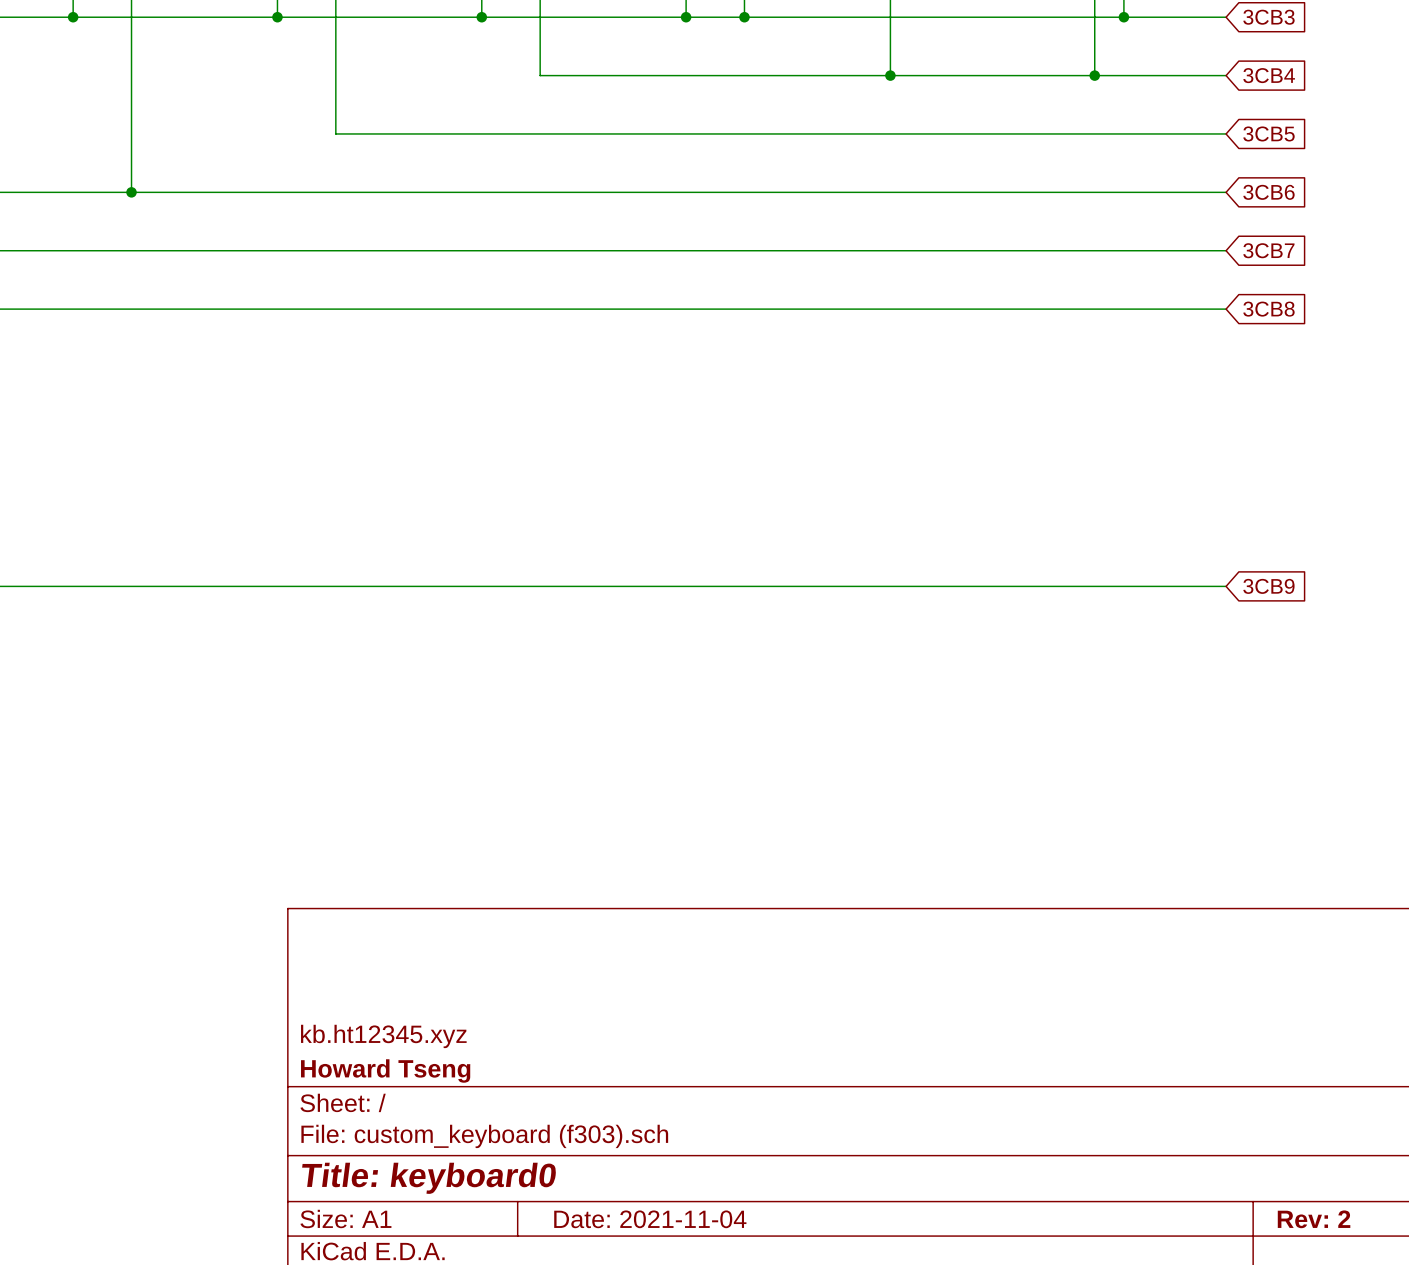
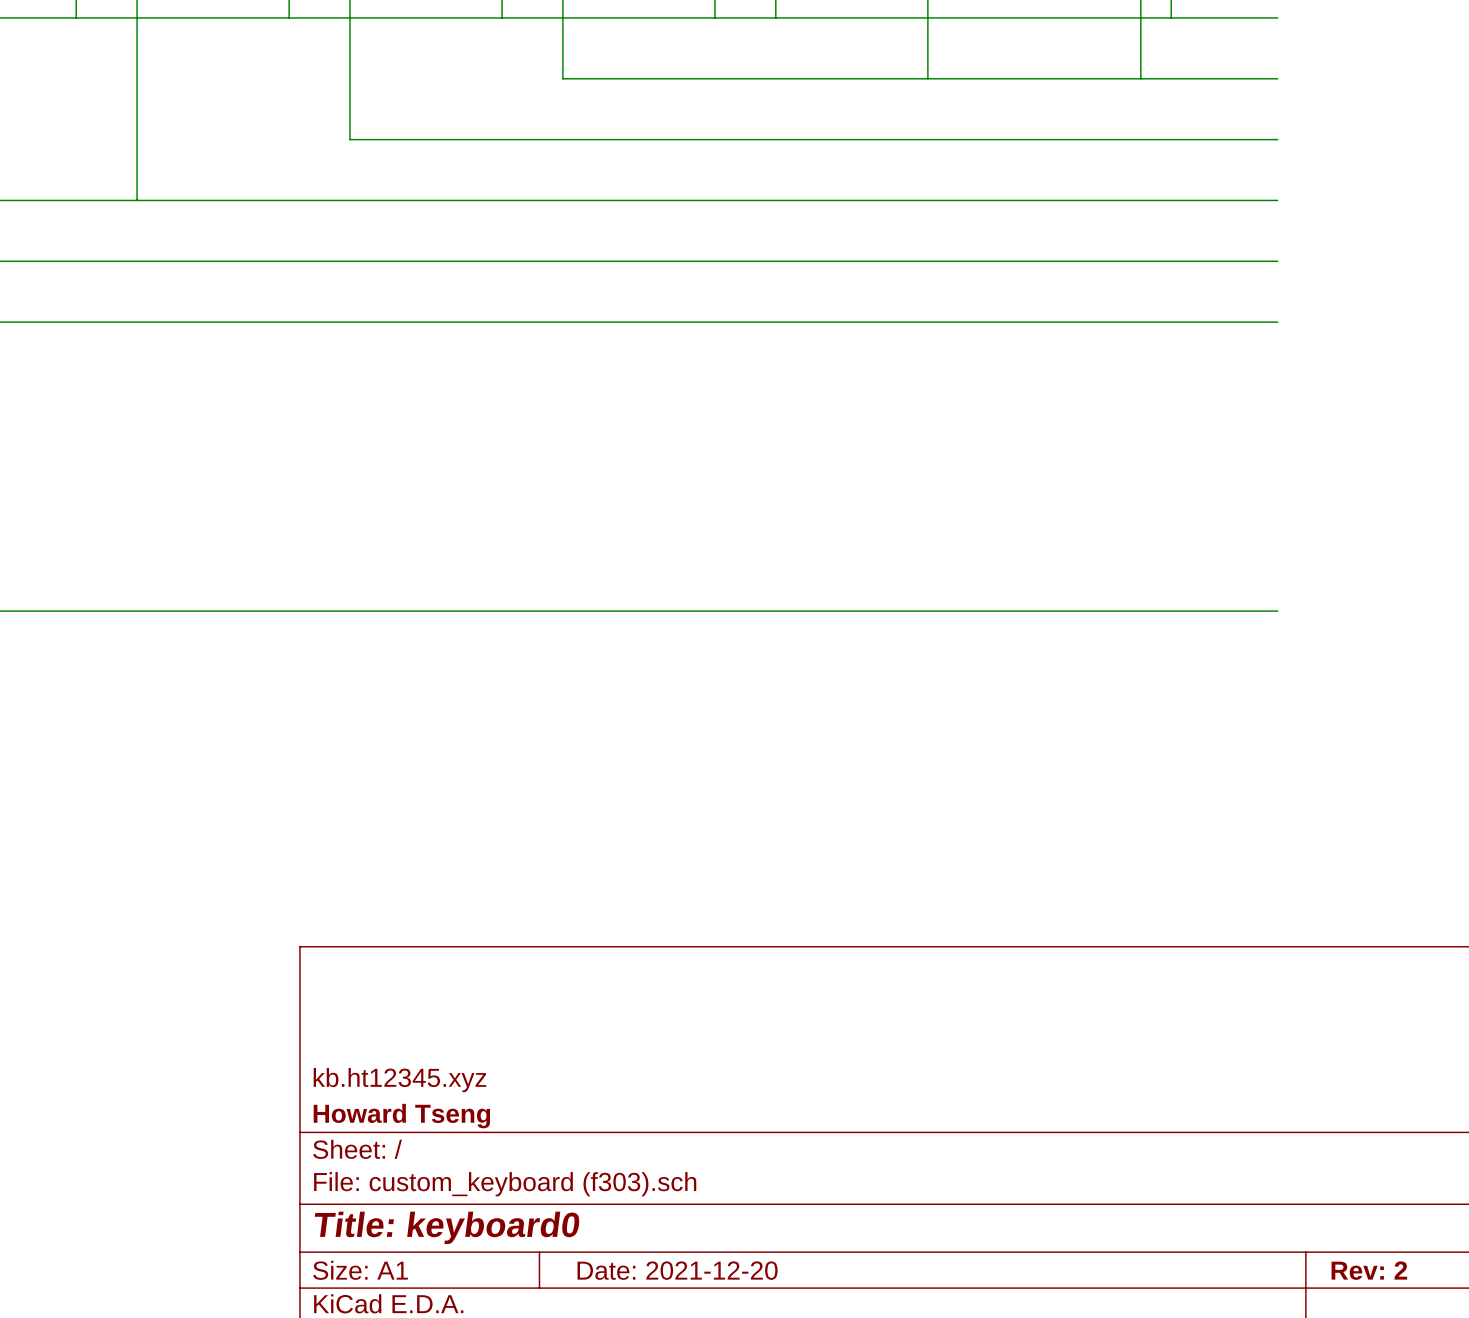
junction: (73, 17) -> none
junction: (277, 17) -> none
junction: (481, 17) -> none
junction: (686, 17) -> none
junction: (744, 17) -> none
junction: (1123, 17) -> none
global label: 3CB3 (1268, 17) -> none
junction: (890, 75) -> none
junction: (1094, 75) -> none
global label: 3CB4 (1269, 75) -> none
global label: 3CB5 (1268, 133) -> none
junction: (131, 192) -> none
global label: 3CB6 (1268, 192) -> none
global label: 3CB7 (1268, 250) -> none
global label: 3CB8 (1268, 309) -> none
global label: 3CB9 (1268, 586) -> none
title block: Date: 2021-11-04 (650, 1219) -> Date: 2021-12-20 (677, 1270)

